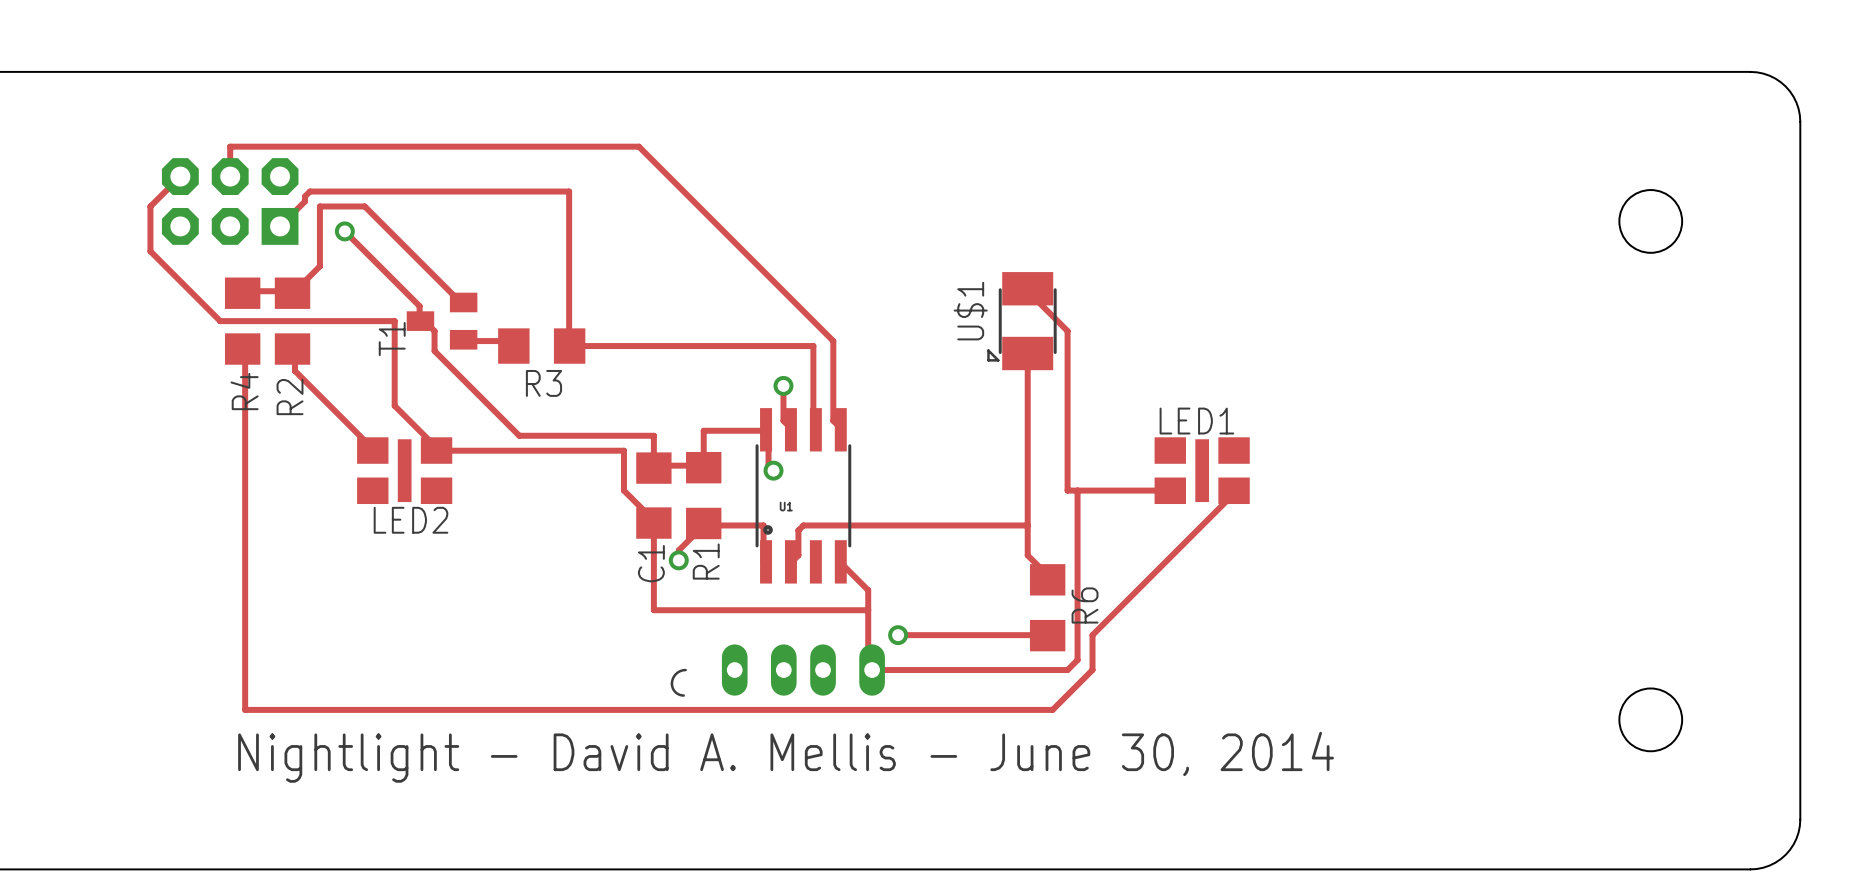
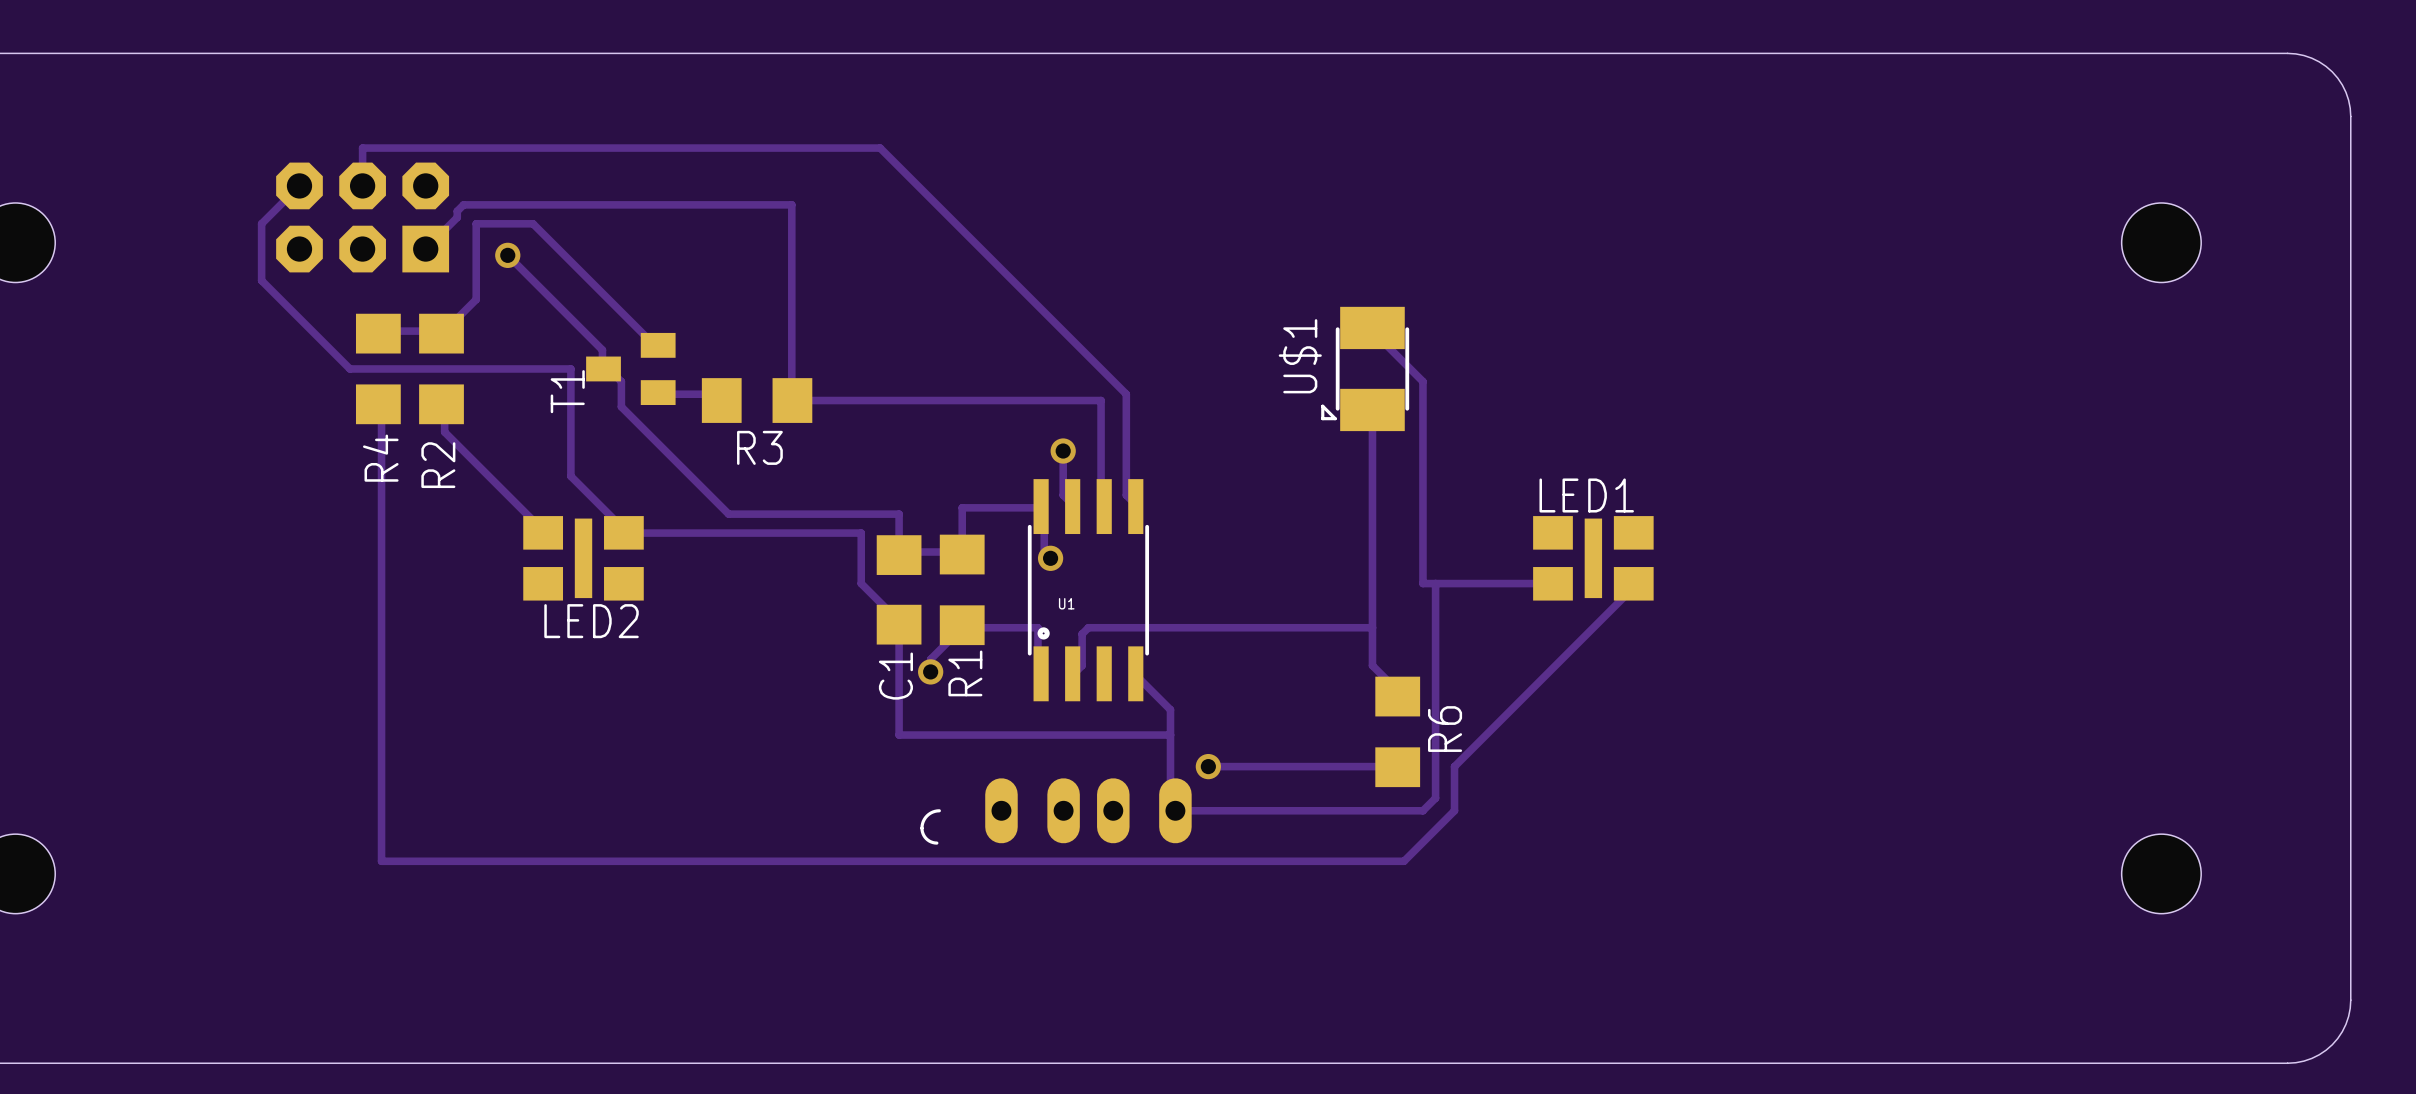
text: Nightlight - David A. Mellis - June 30, 2014 (786, 757) -> none

